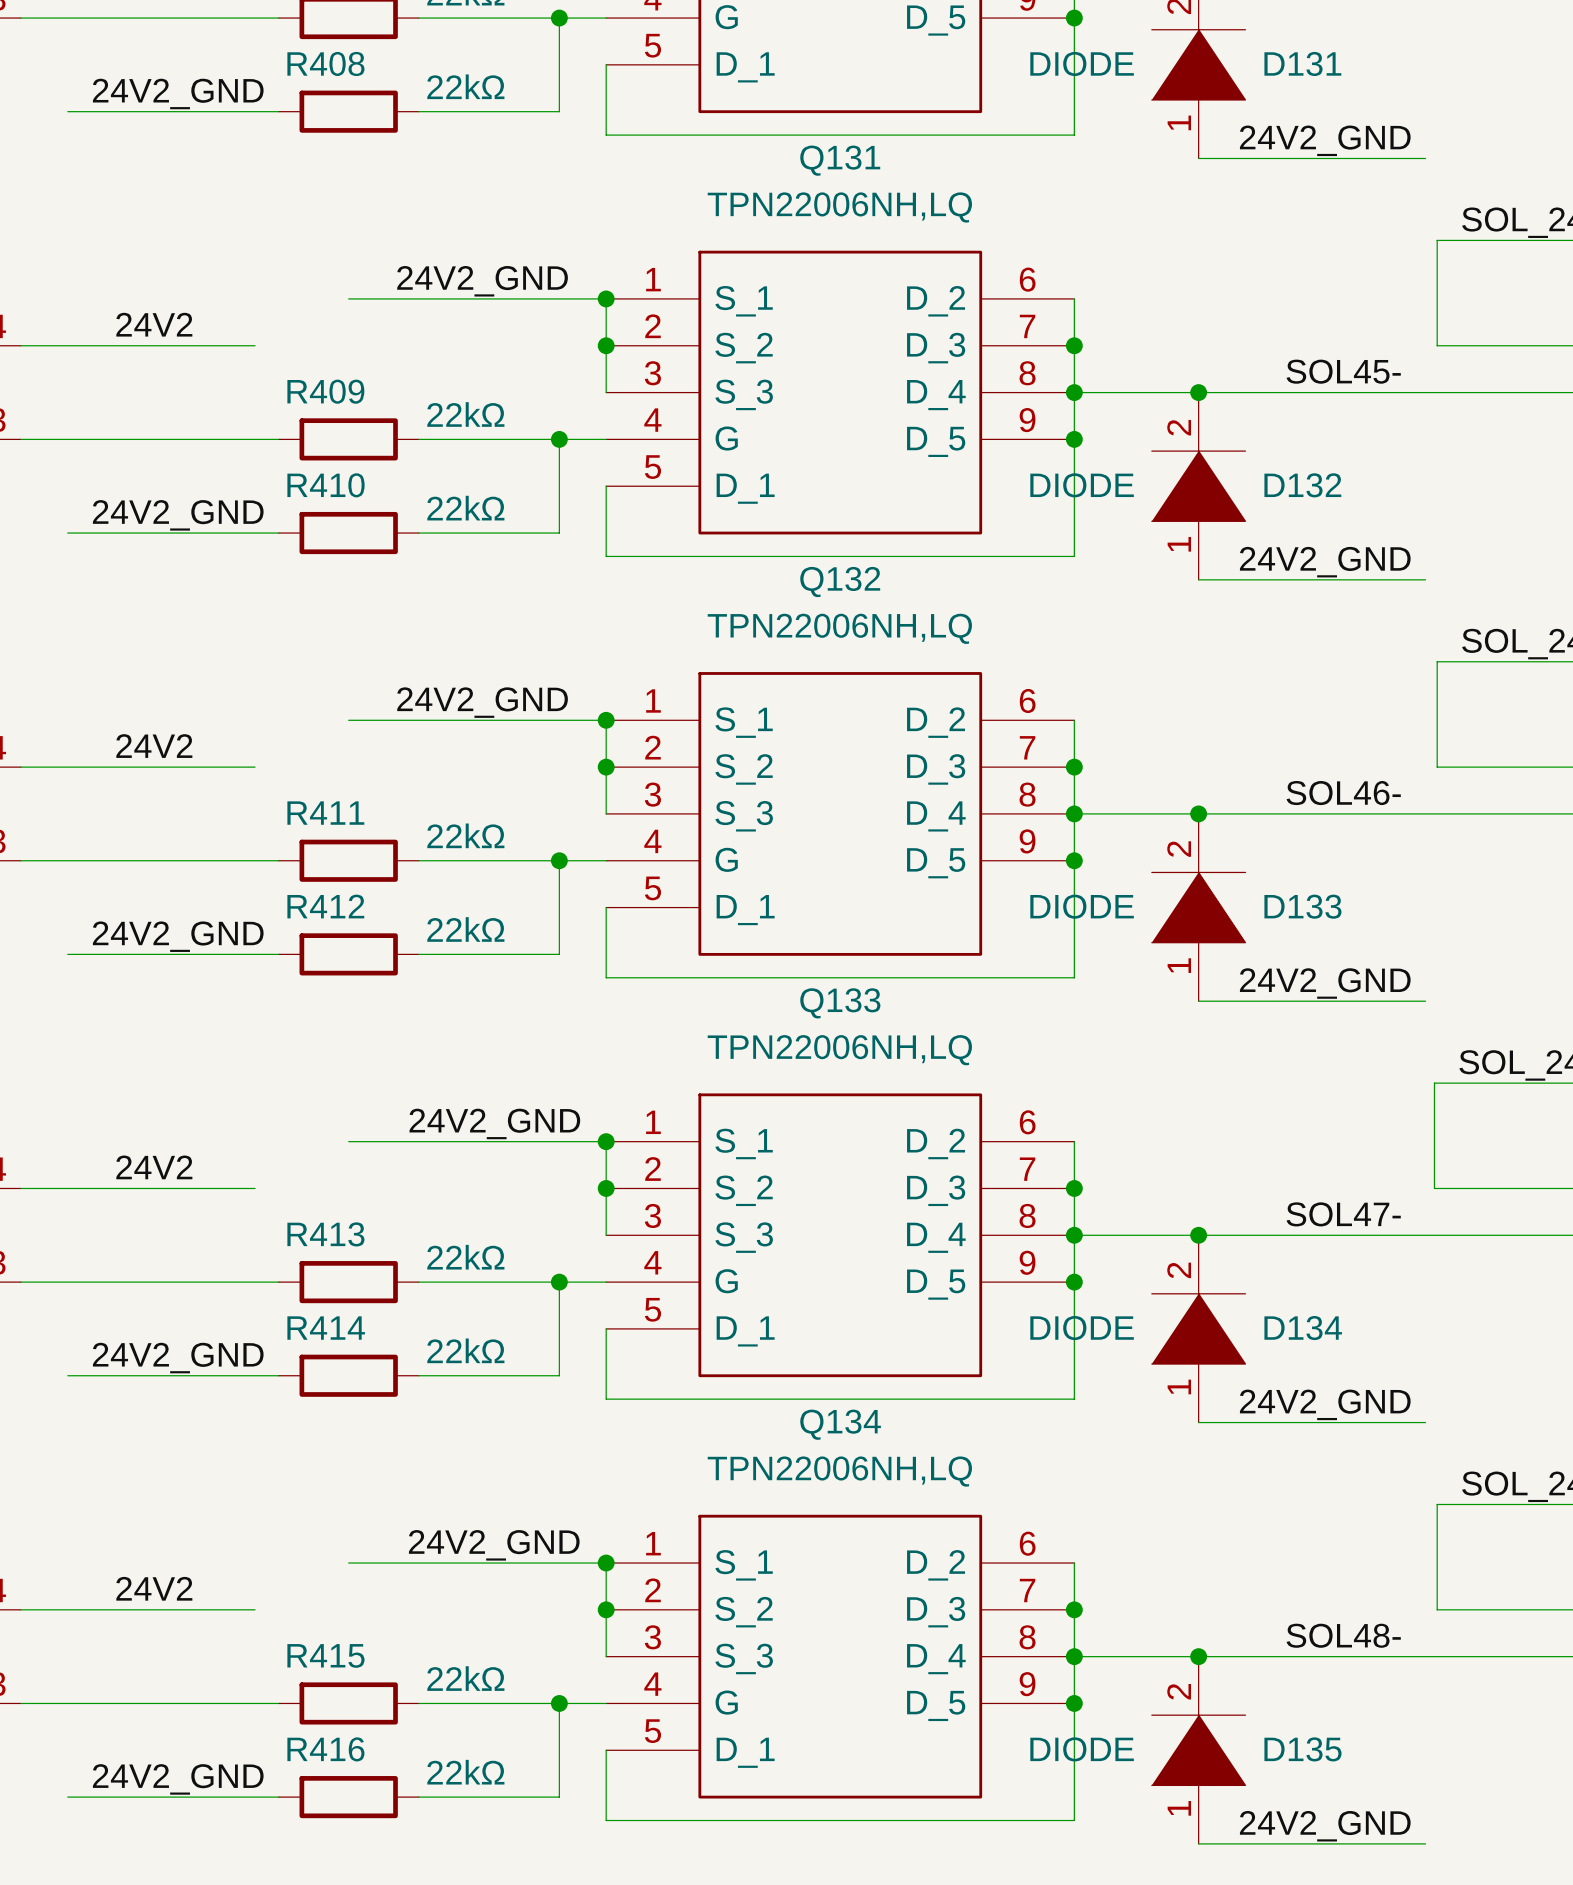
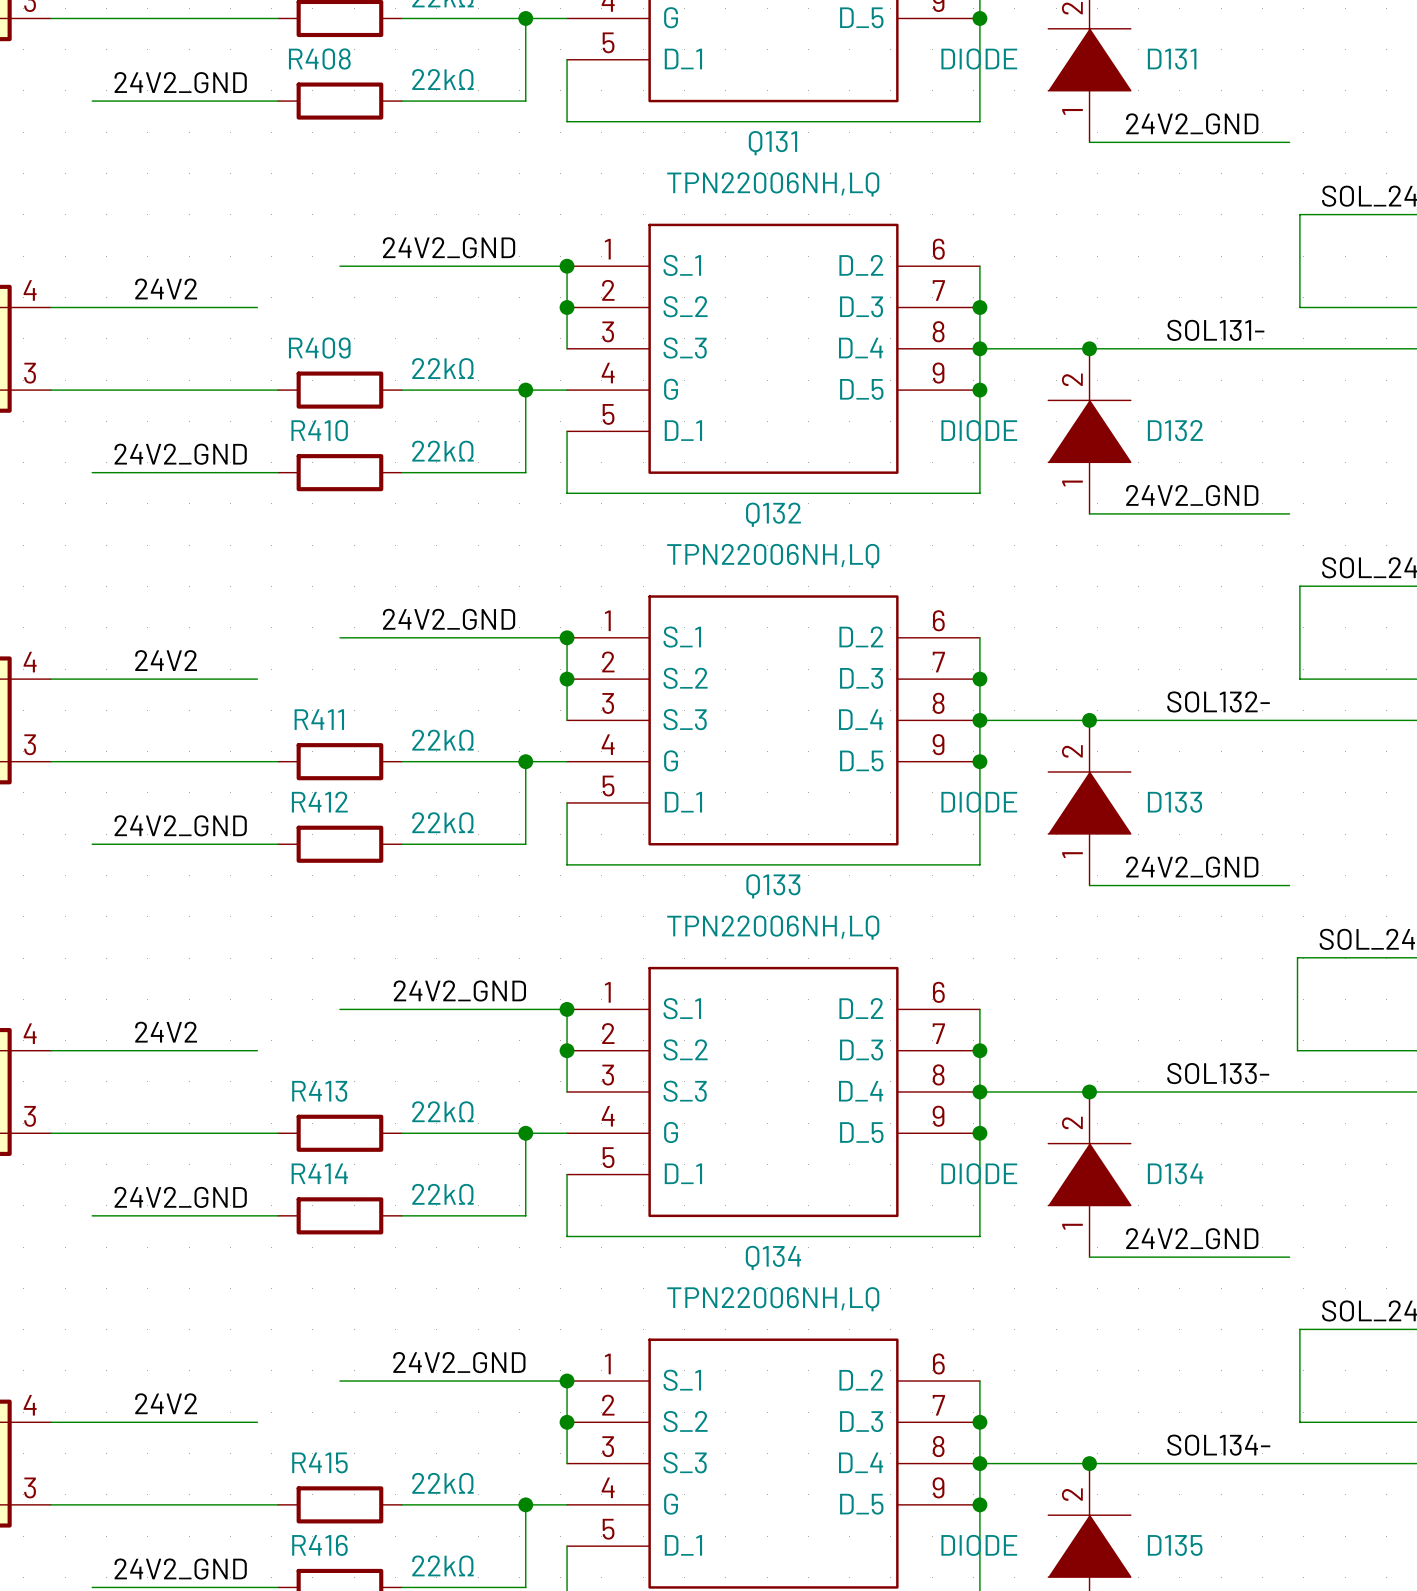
label: SOL45- (1343, 371) -> SOL131- (1215, 330)
label: SOL46- (1343, 793) -> SOL132- (1218, 701)
label: SOL47- (1343, 1214) -> SOL133- (1218, 1073)
label: SOL48- (1343, 1635) -> SOL134- (1218, 1445)

